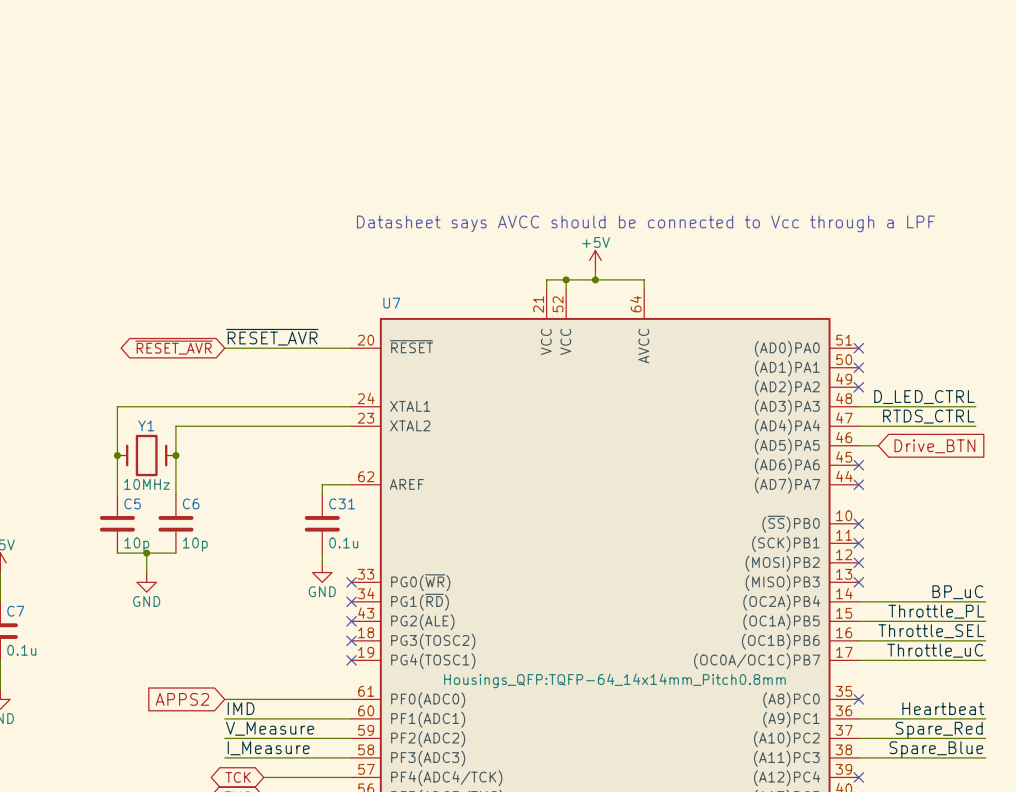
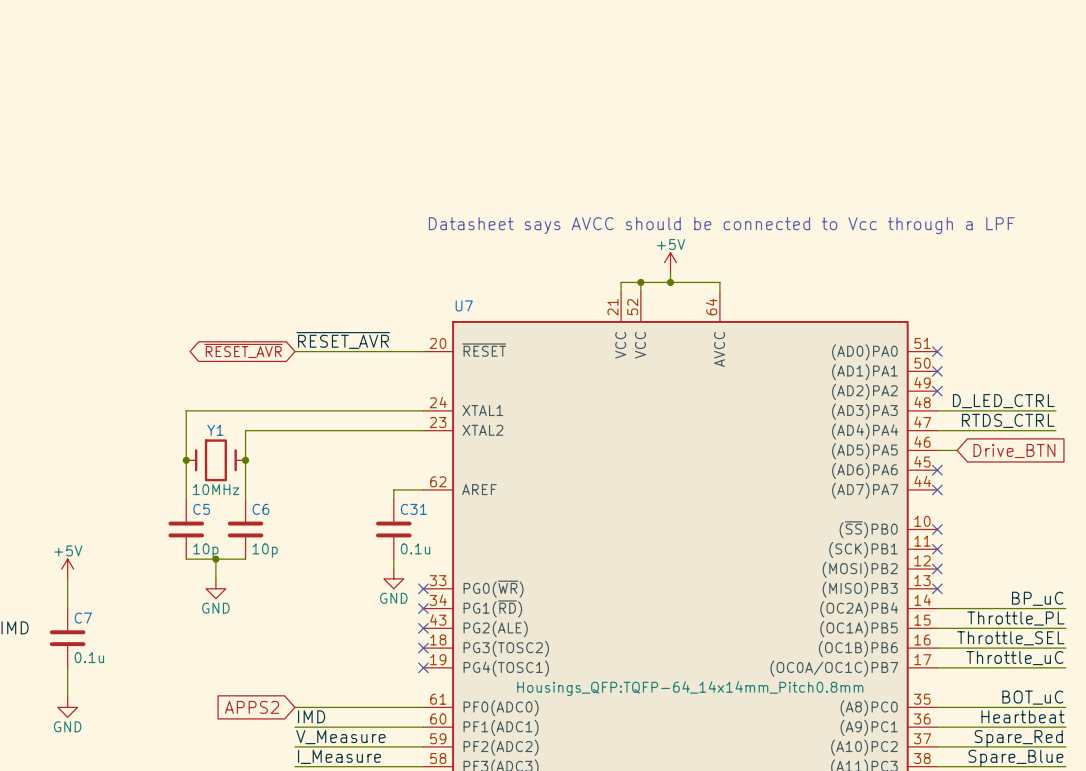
label: none -> BOT_uC (1032, 697)
wire: none -> (937, 707) (1065, 707)
no-connect mark: (858, 699) -> none

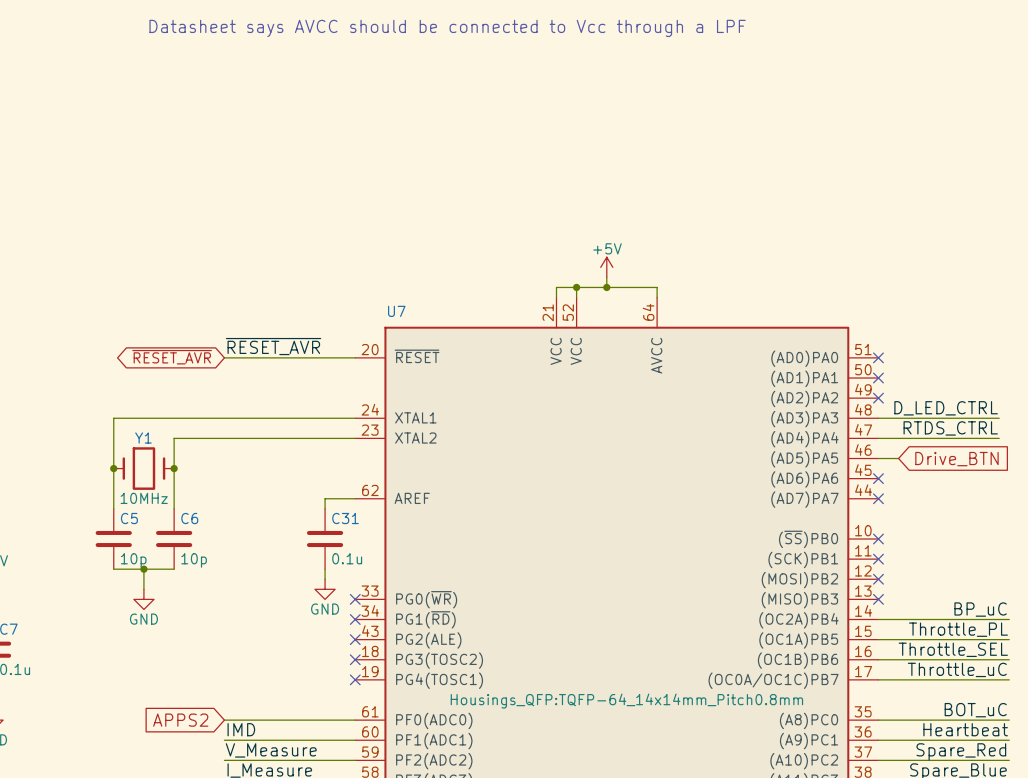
text: none -> Datasheet says AVCC should be connected to Vcc through a LPF (447, 28)
text: Datasheet says AVCC should be connected to Vcc through a LPF (721, 225) -> none

